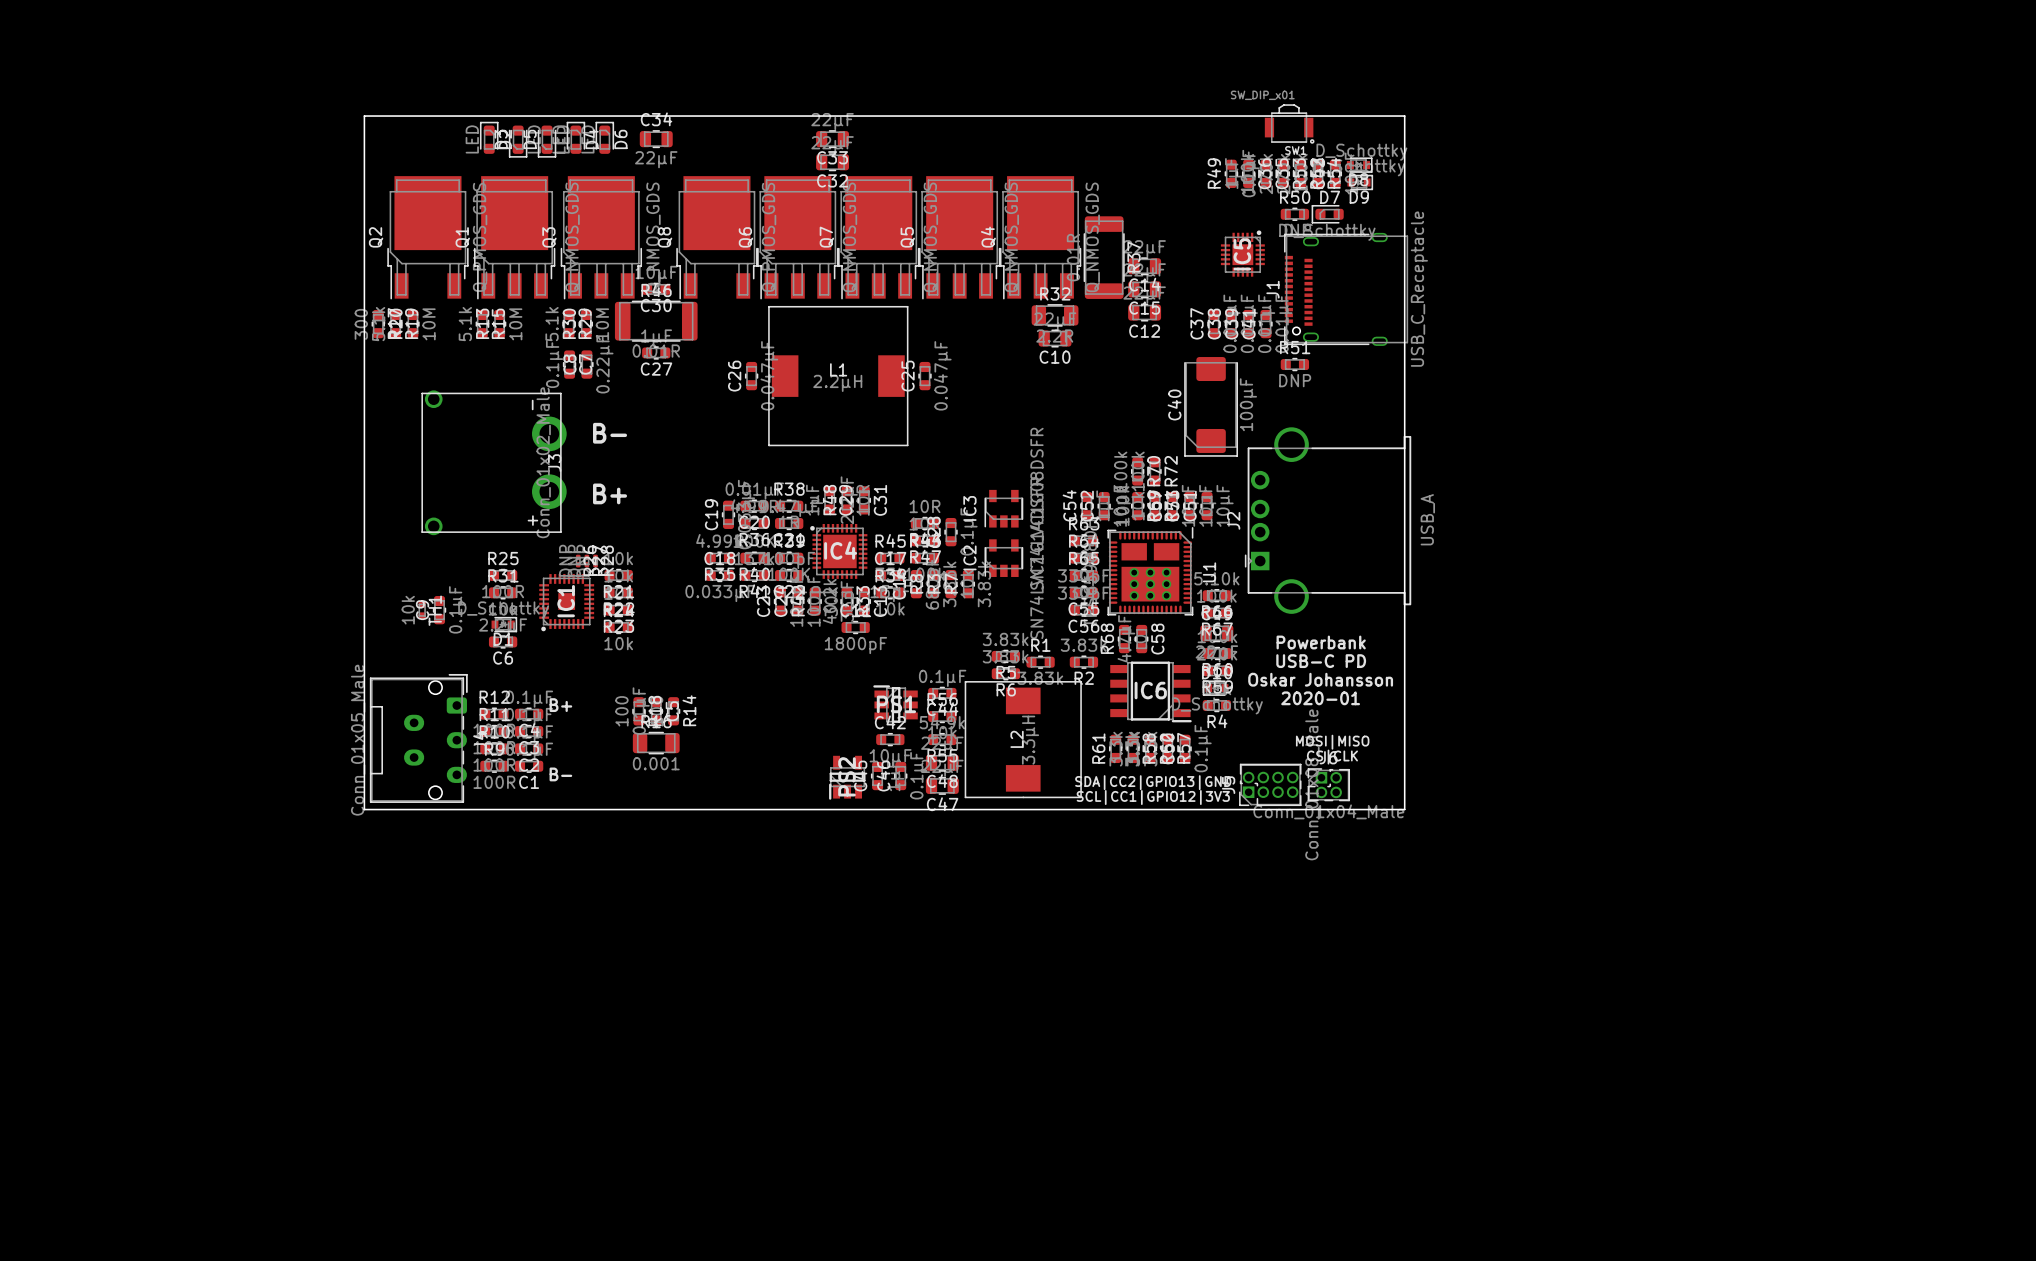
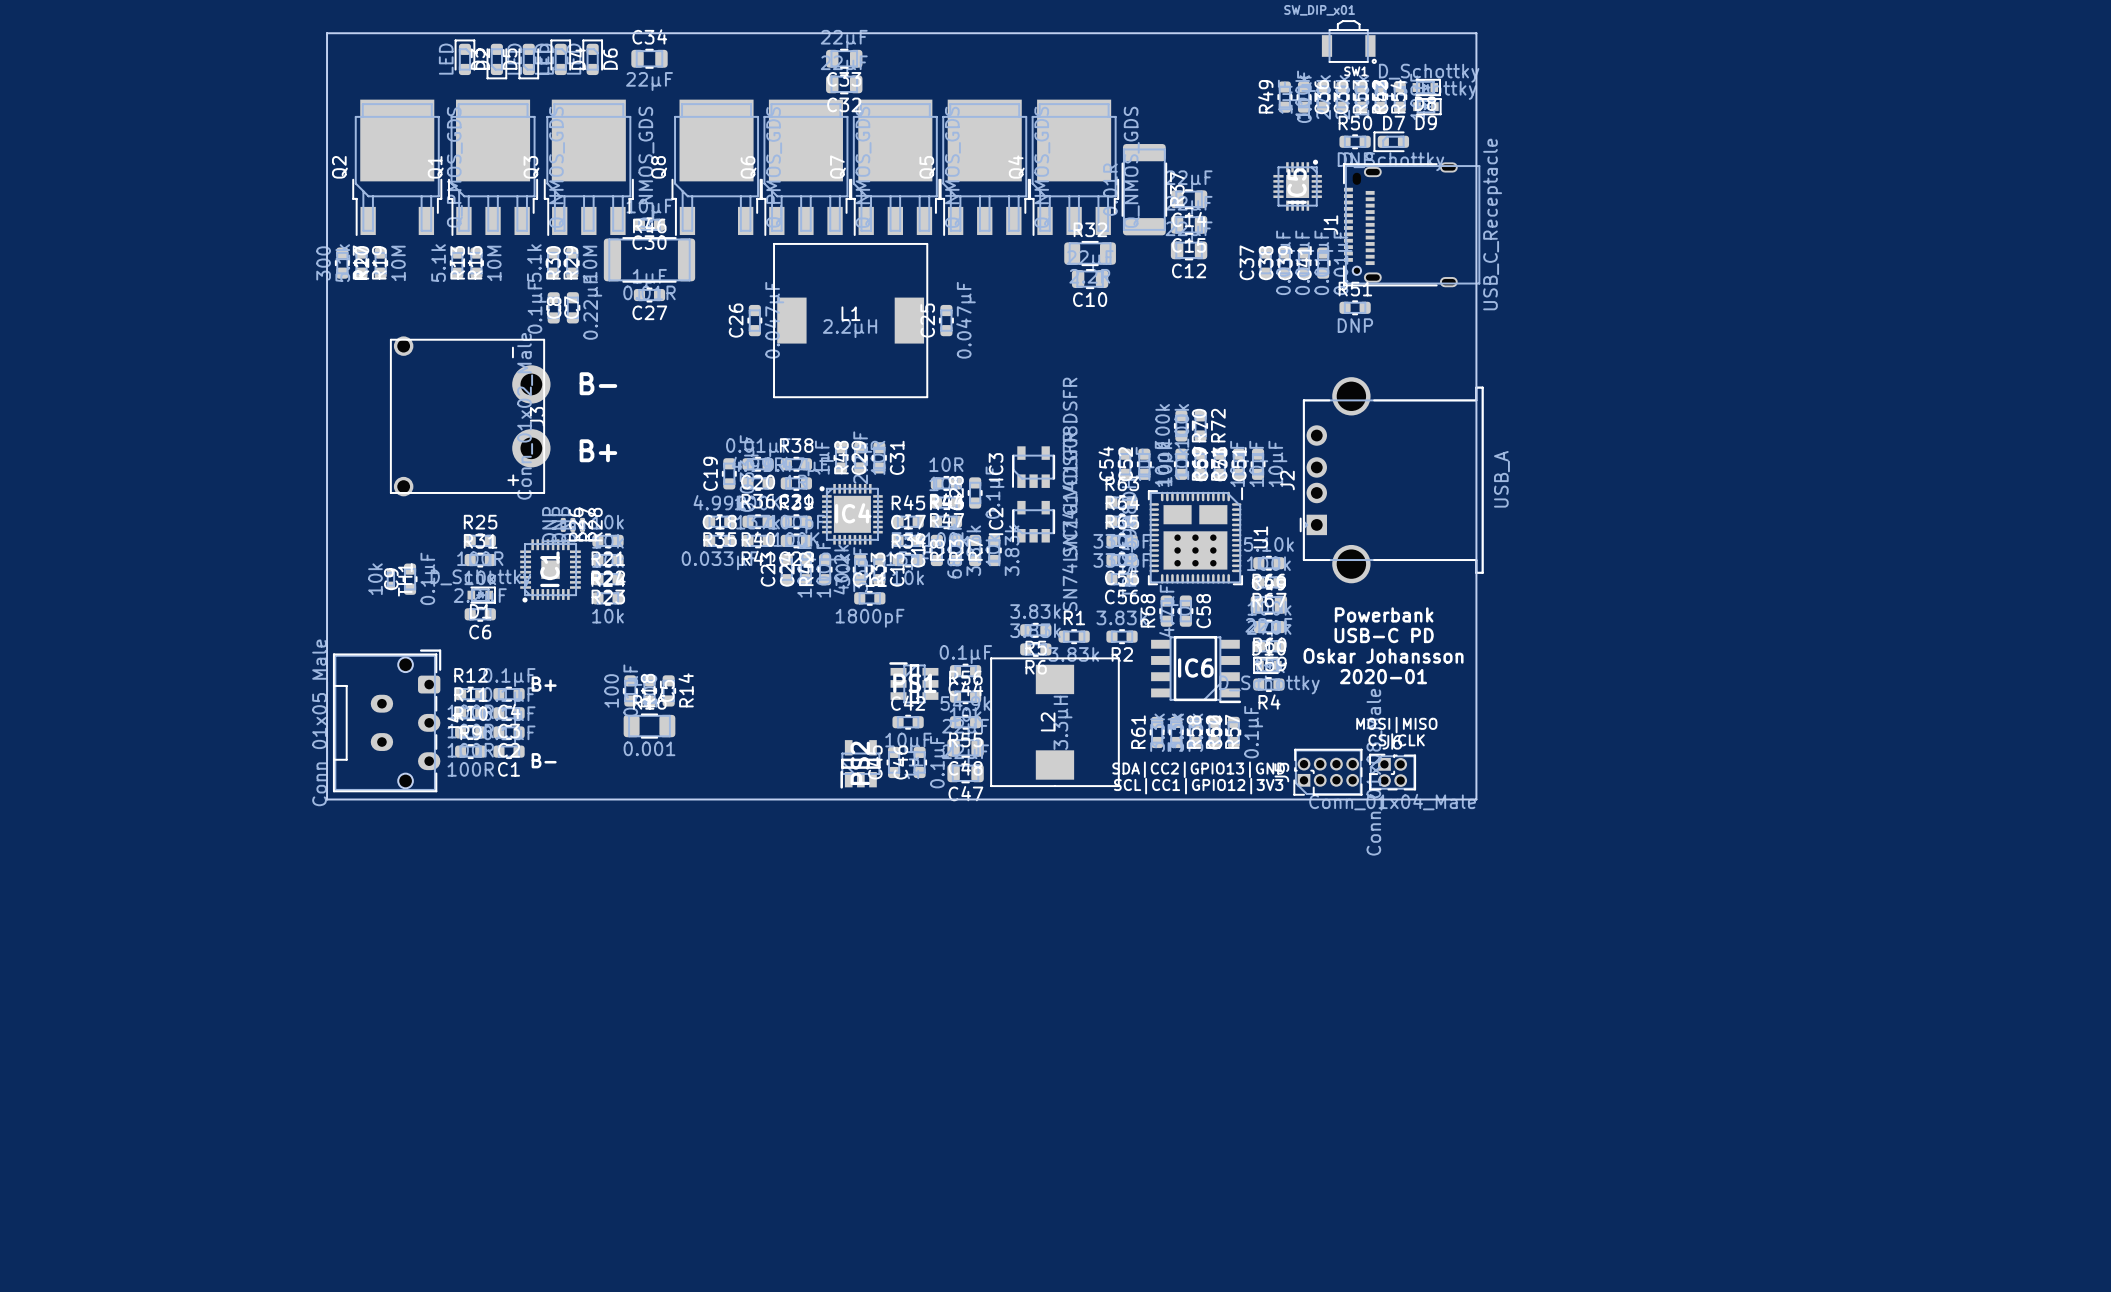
C40: 100µF (1211, 406) -> none

